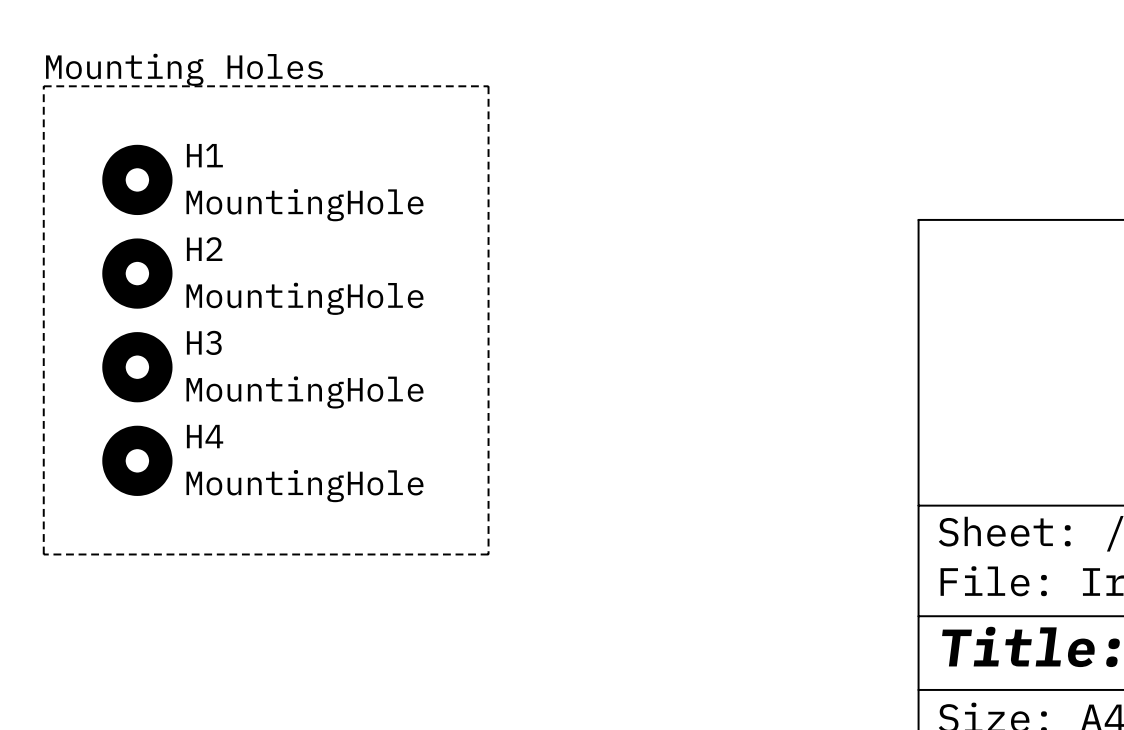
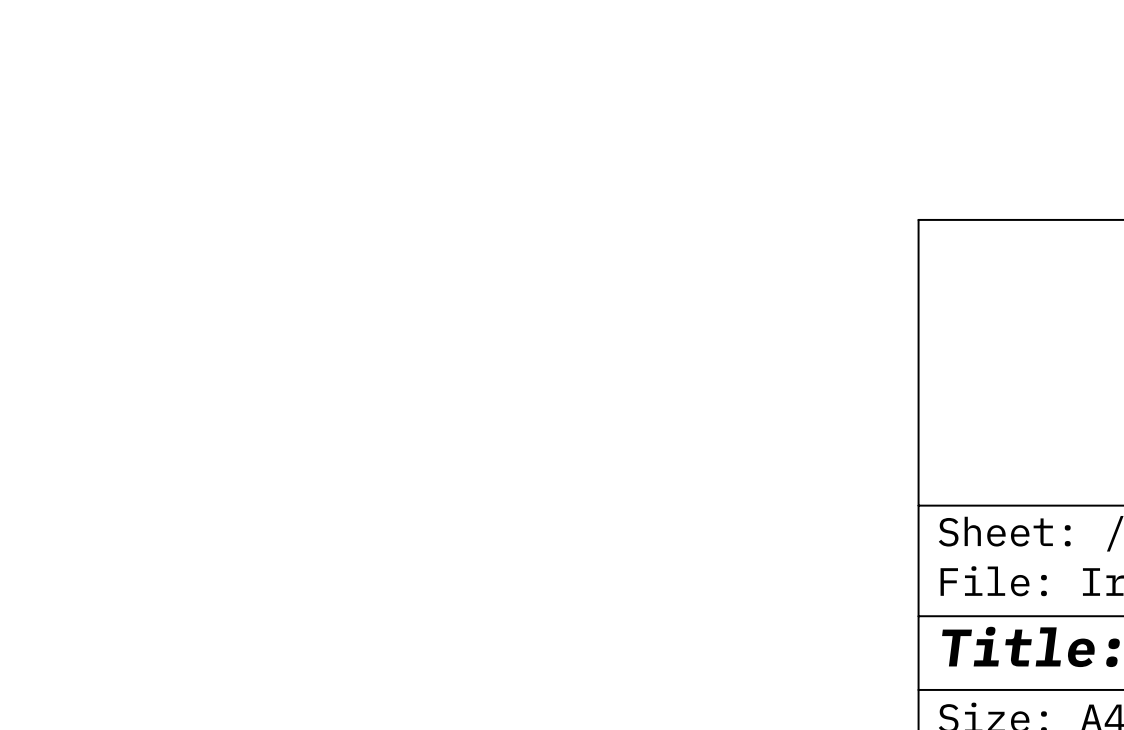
text: Mounting Holes (184, 69) -> none
line: (43, 86) (488, 86) (488, 554) (43, 554) (43, 86) -> none
H1: MountingHole (137, 179) -> none
H2: MountingHole (137, 273) -> none
H3: MountingHole (137, 367) -> none
H4: MountingHole (137, 460) -> none

